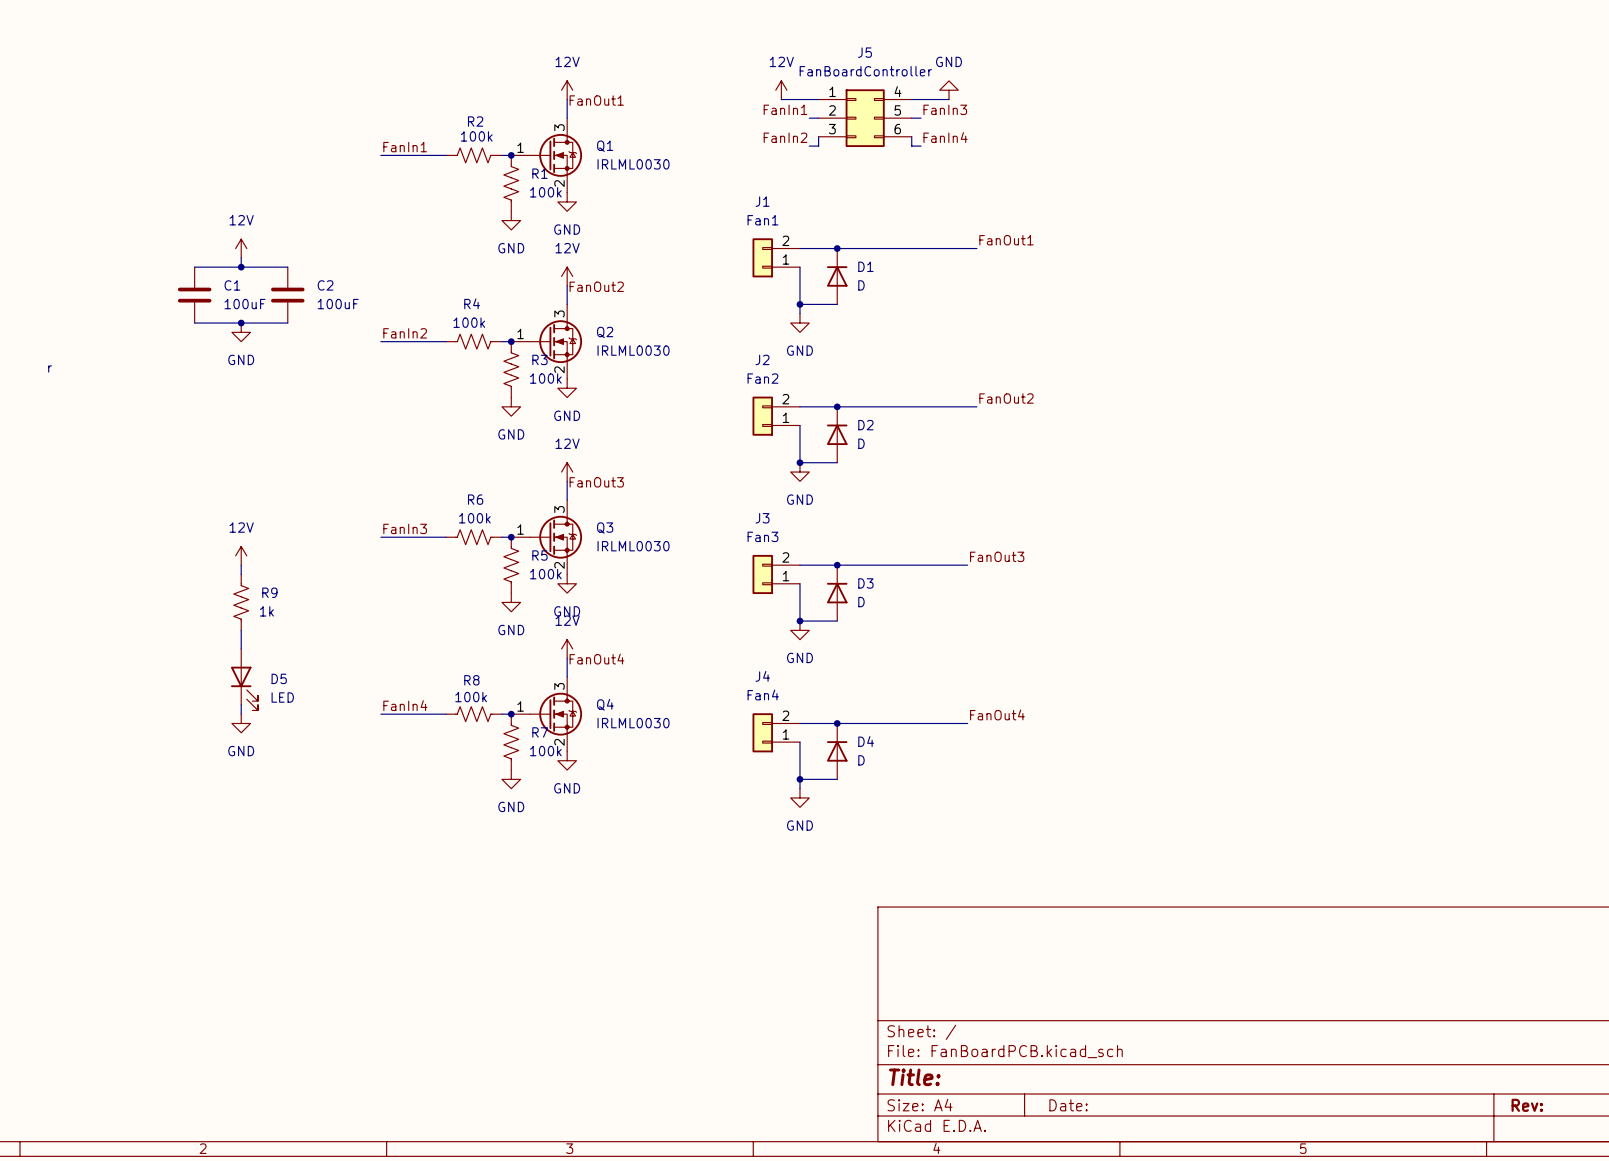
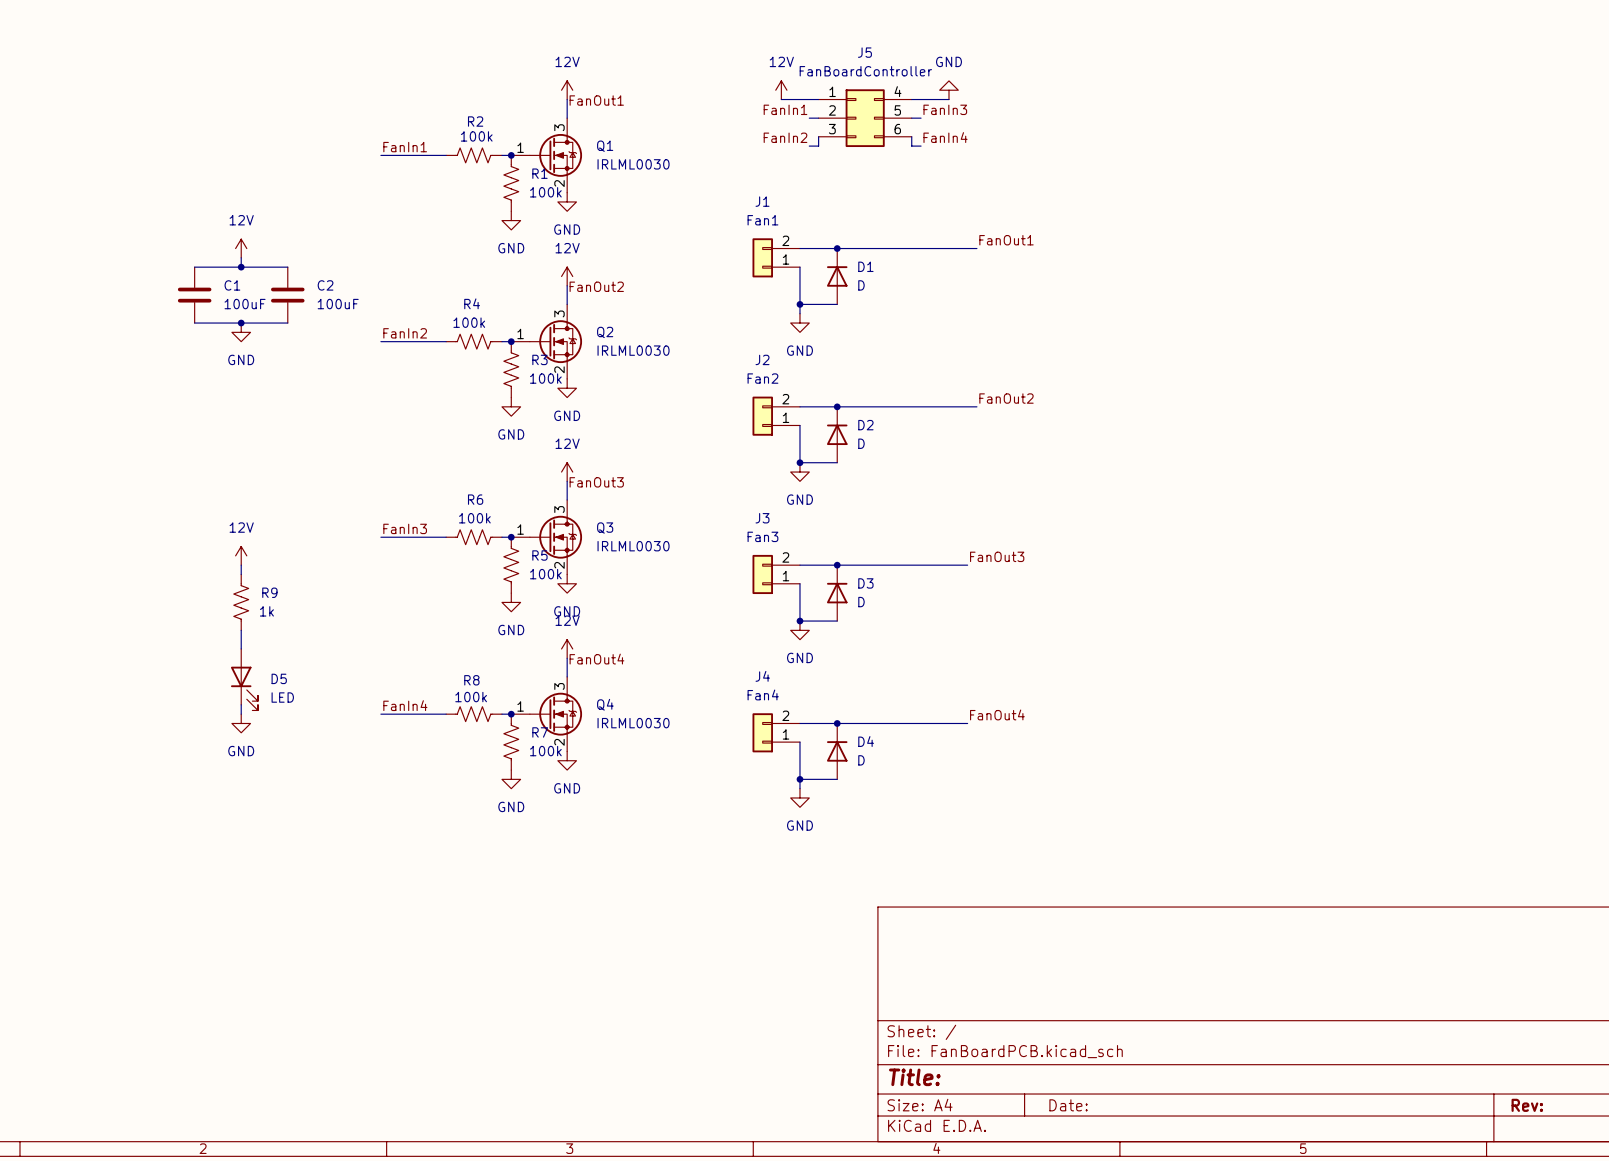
text: r (50, 368) -> none

